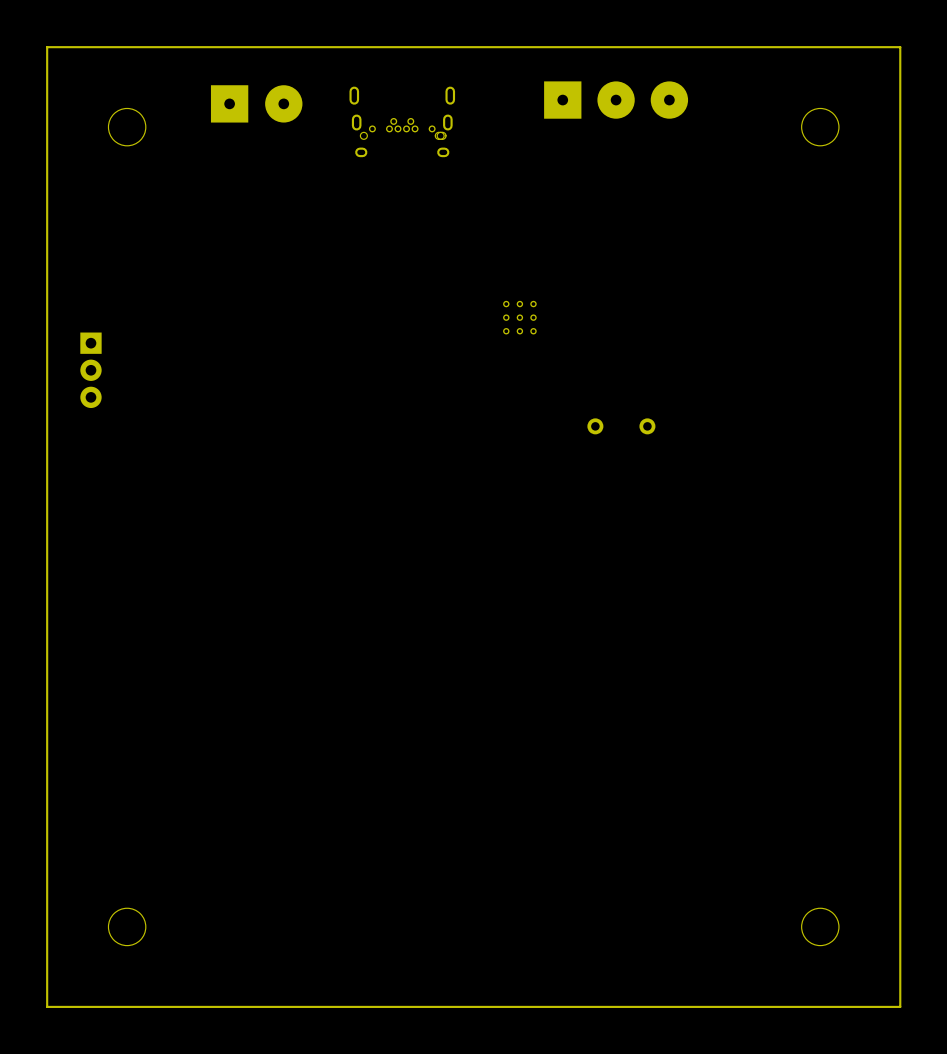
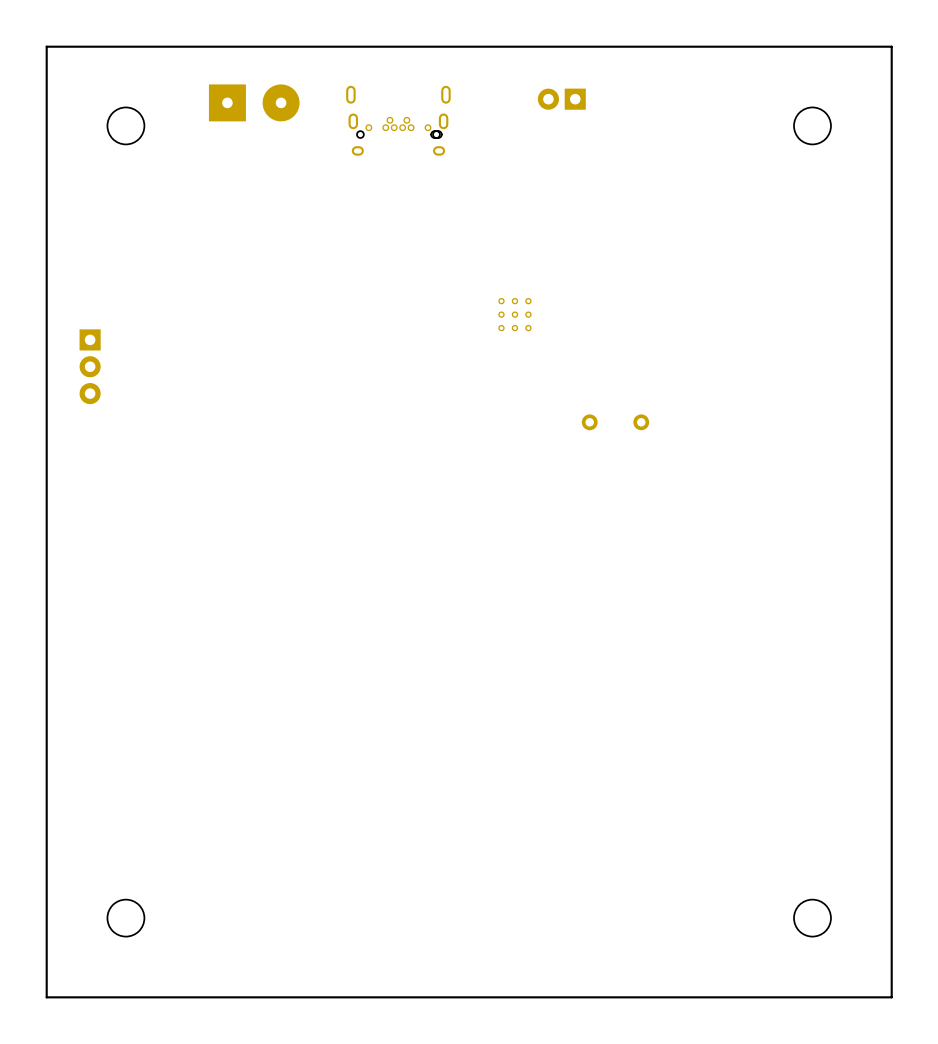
part: none -> (561, 99)
part: (616, 100) -> none

